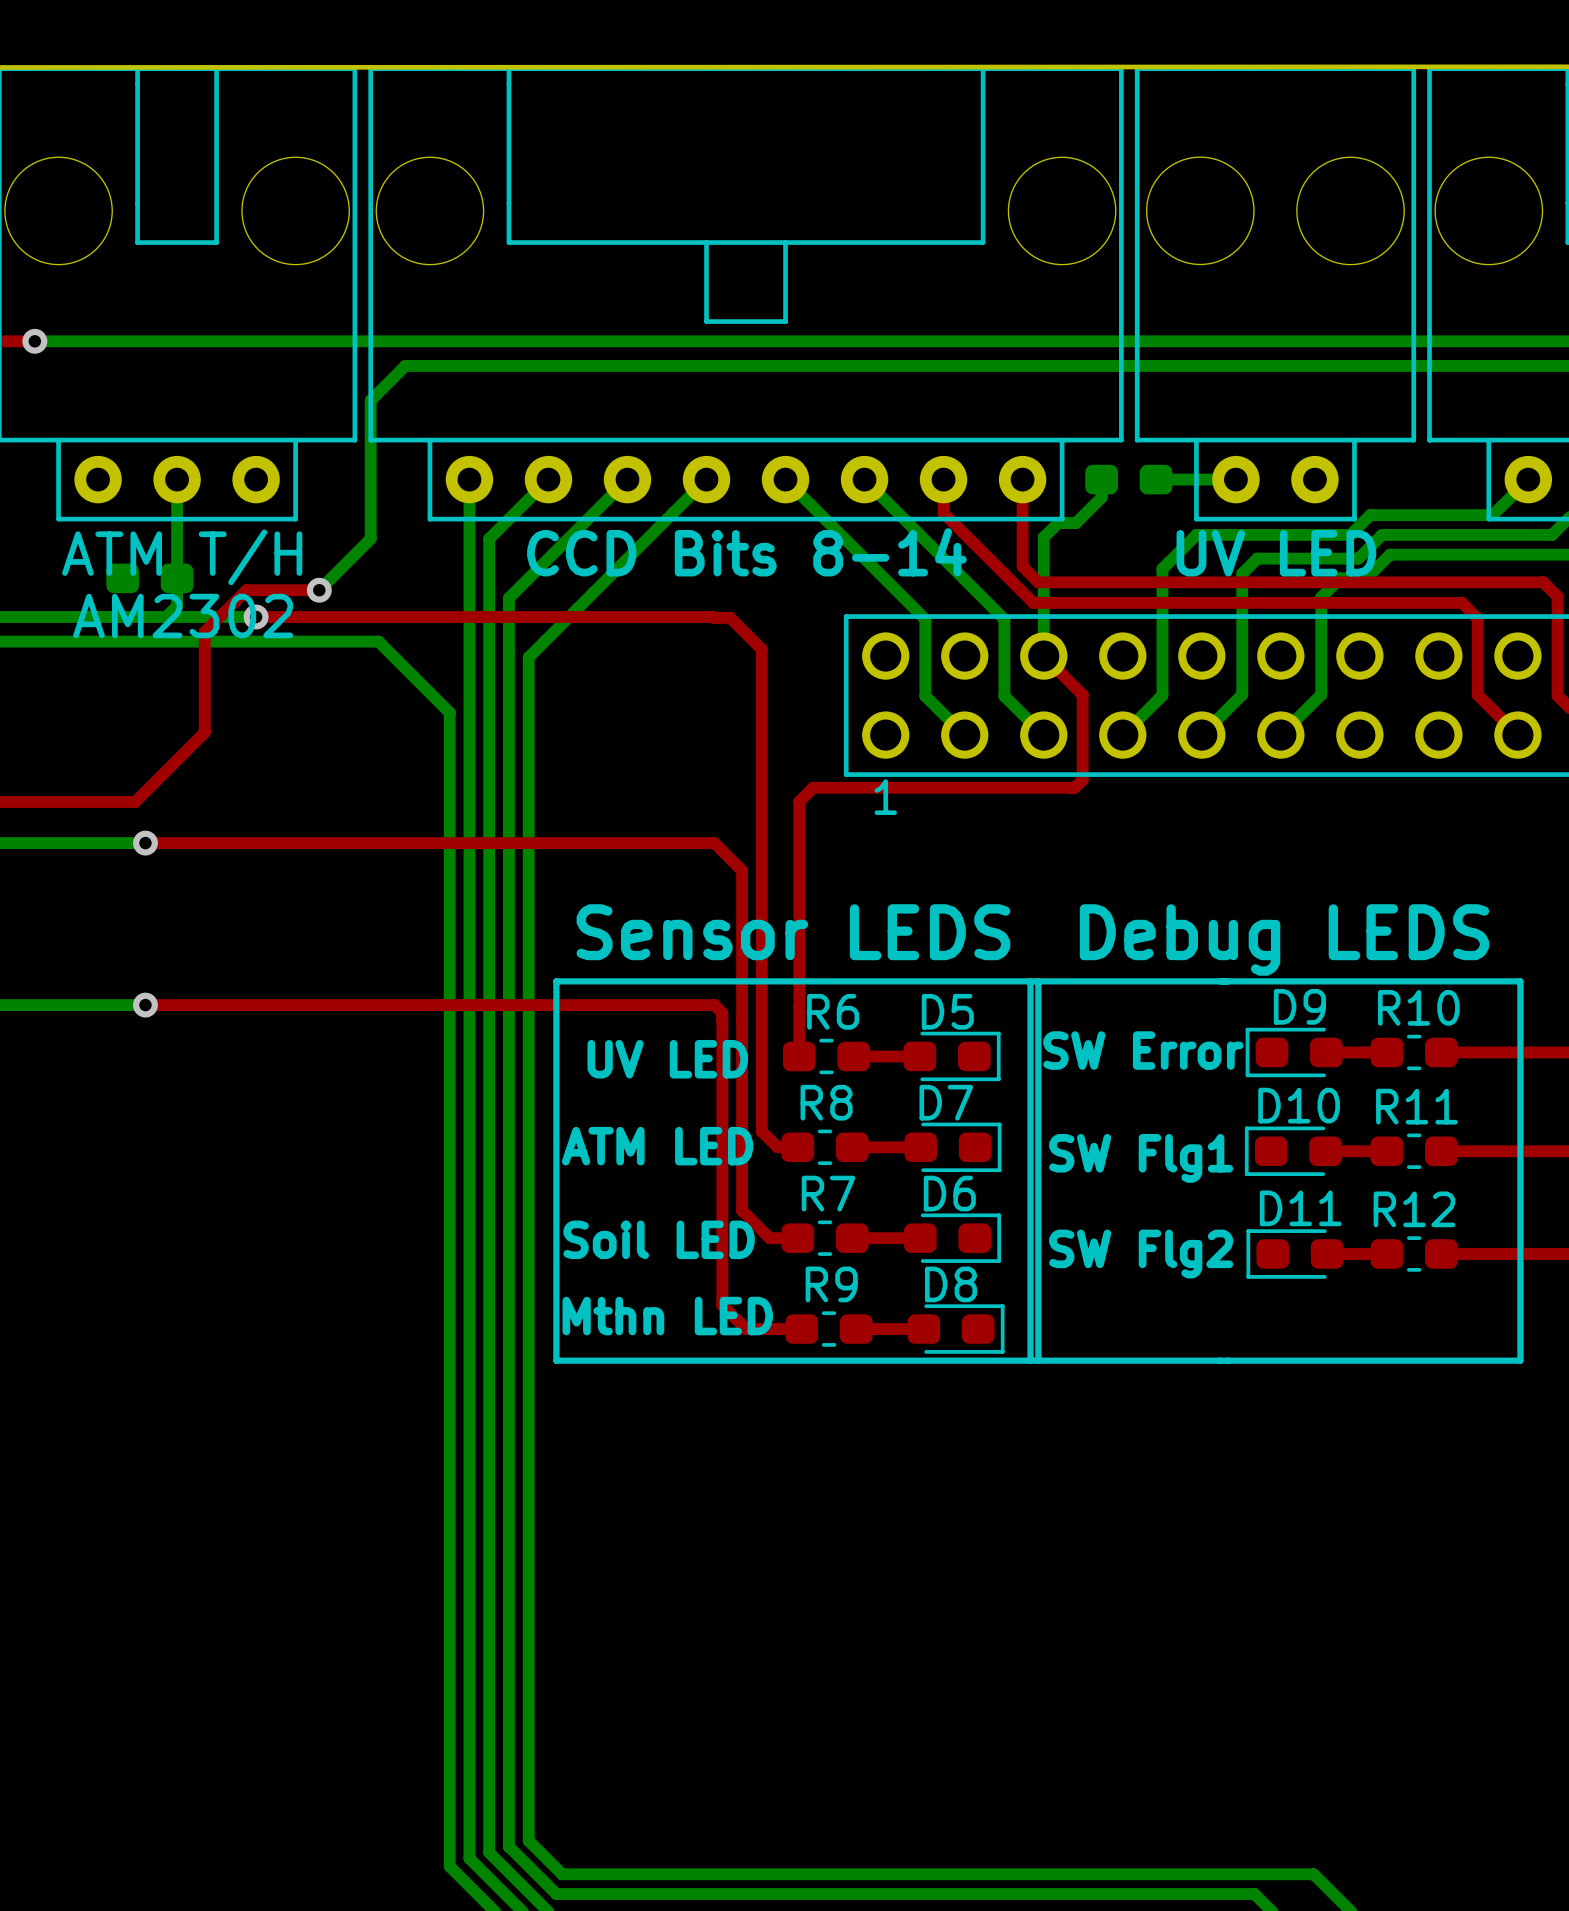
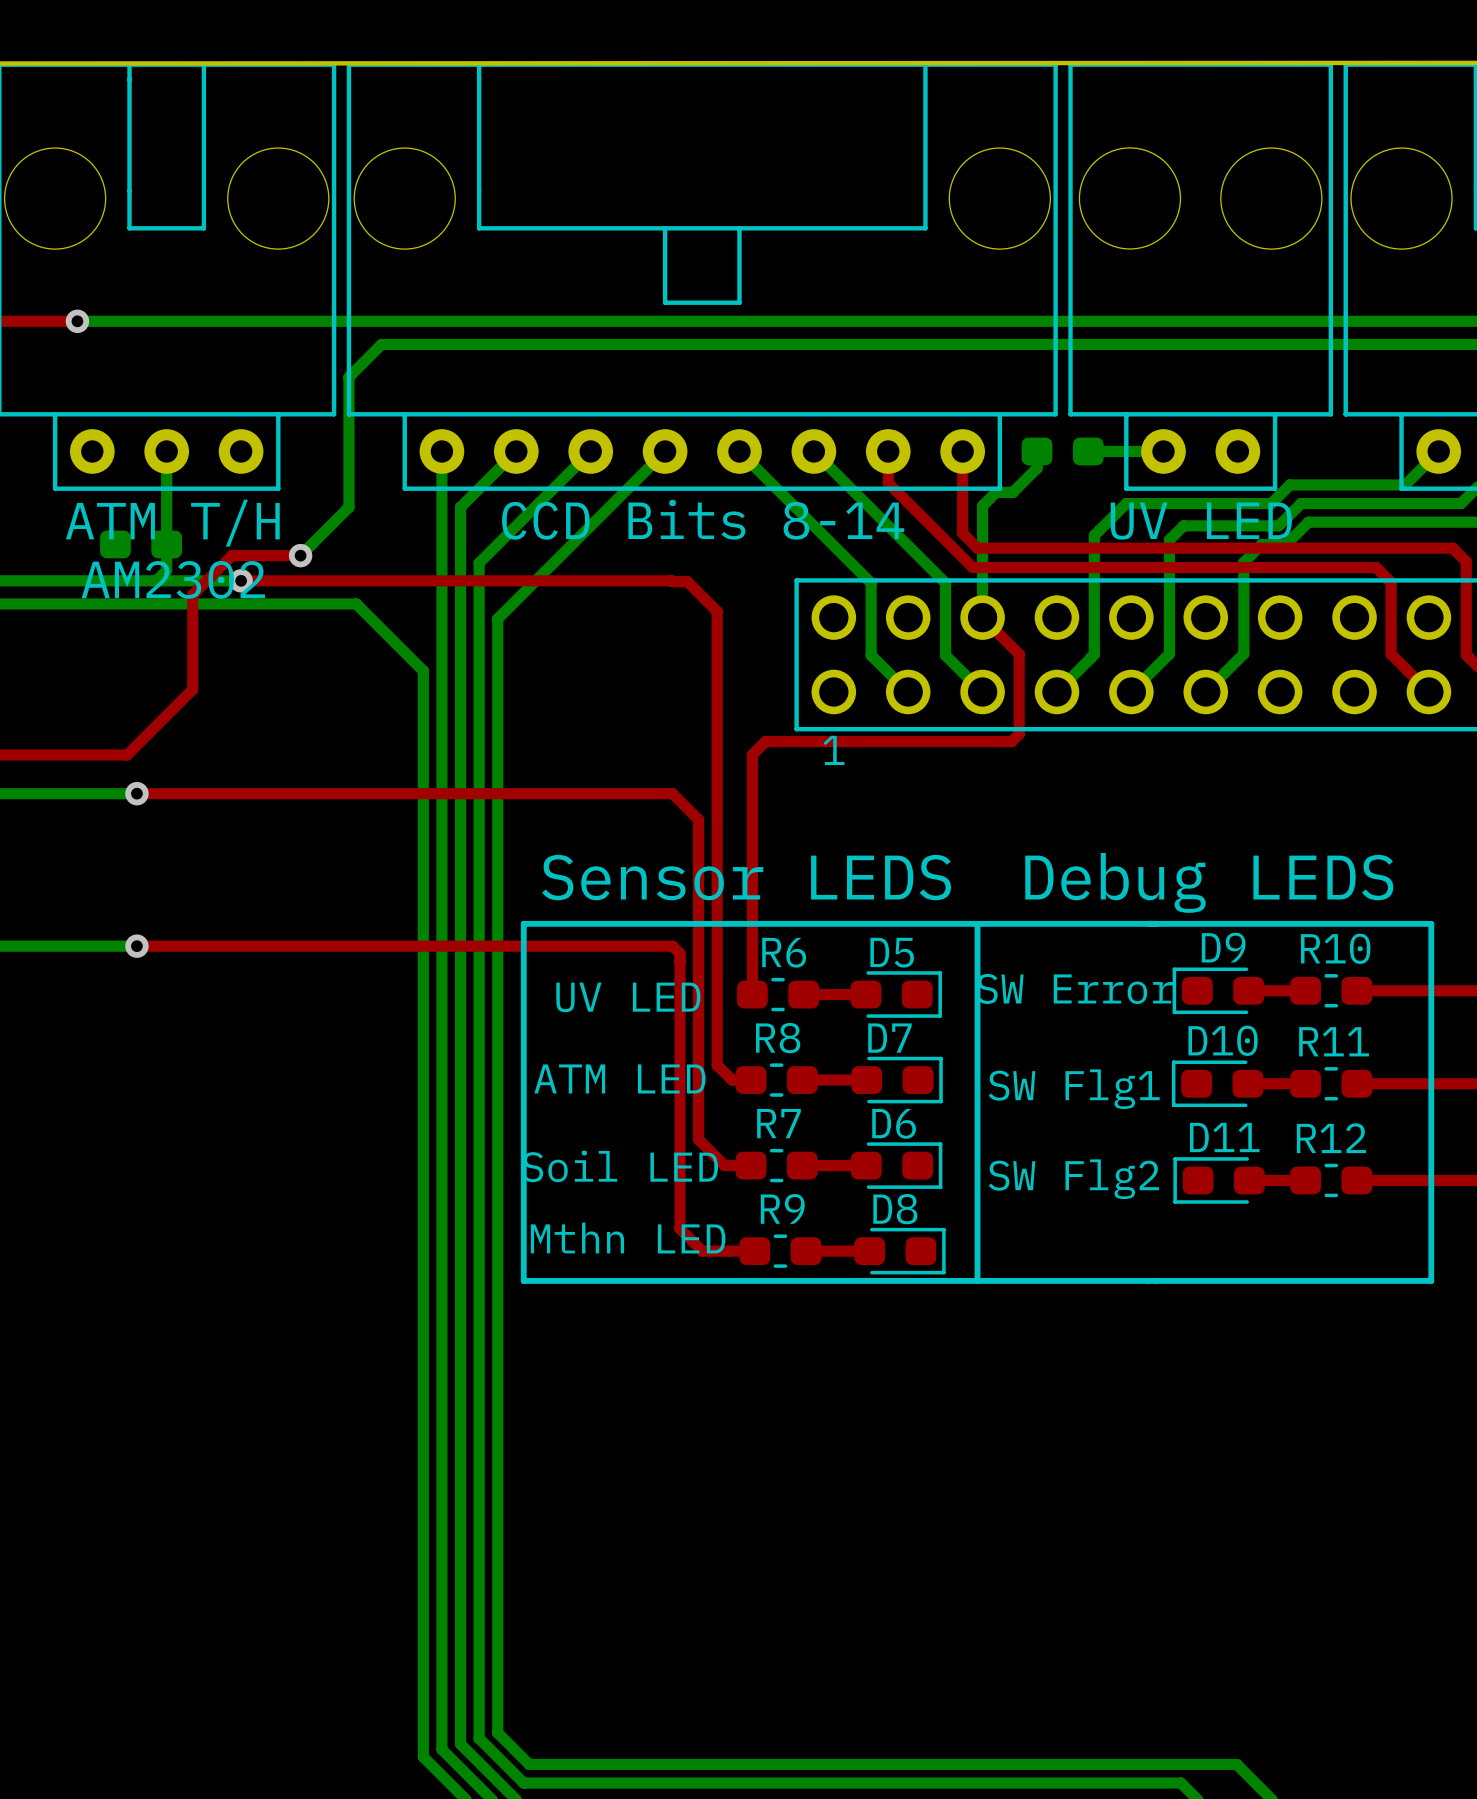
top track: none -> (32, 321) (77, 321)
bottom track: (34, 341) (82, 341) -> none
via position: (34, 341) -> (77, 321)
line: (1030, 981) (1030, 1360) -> none

